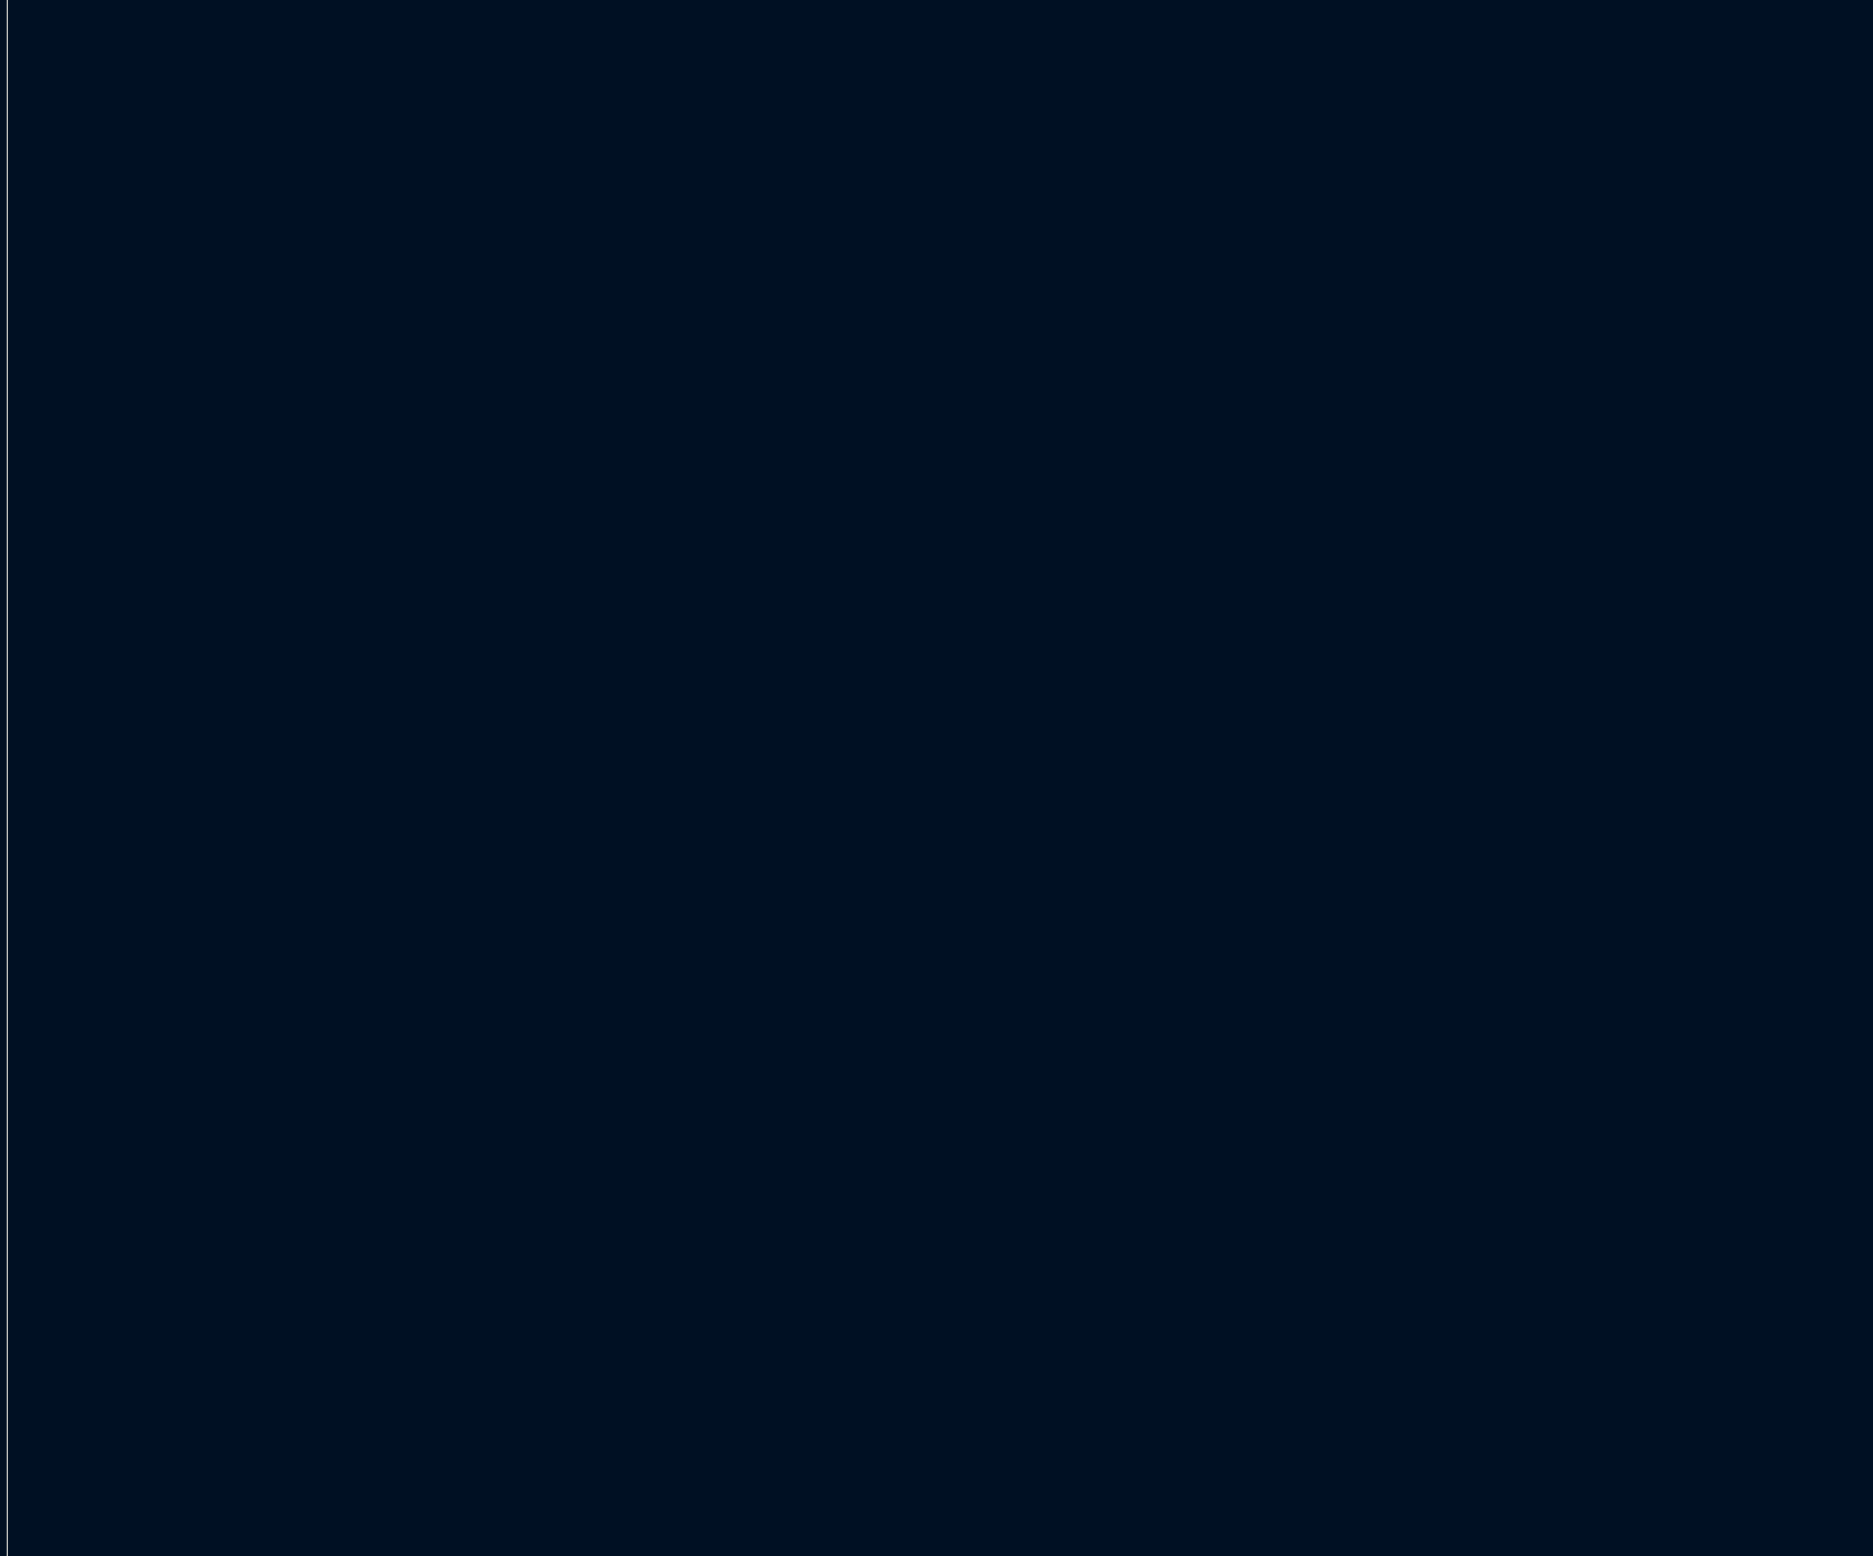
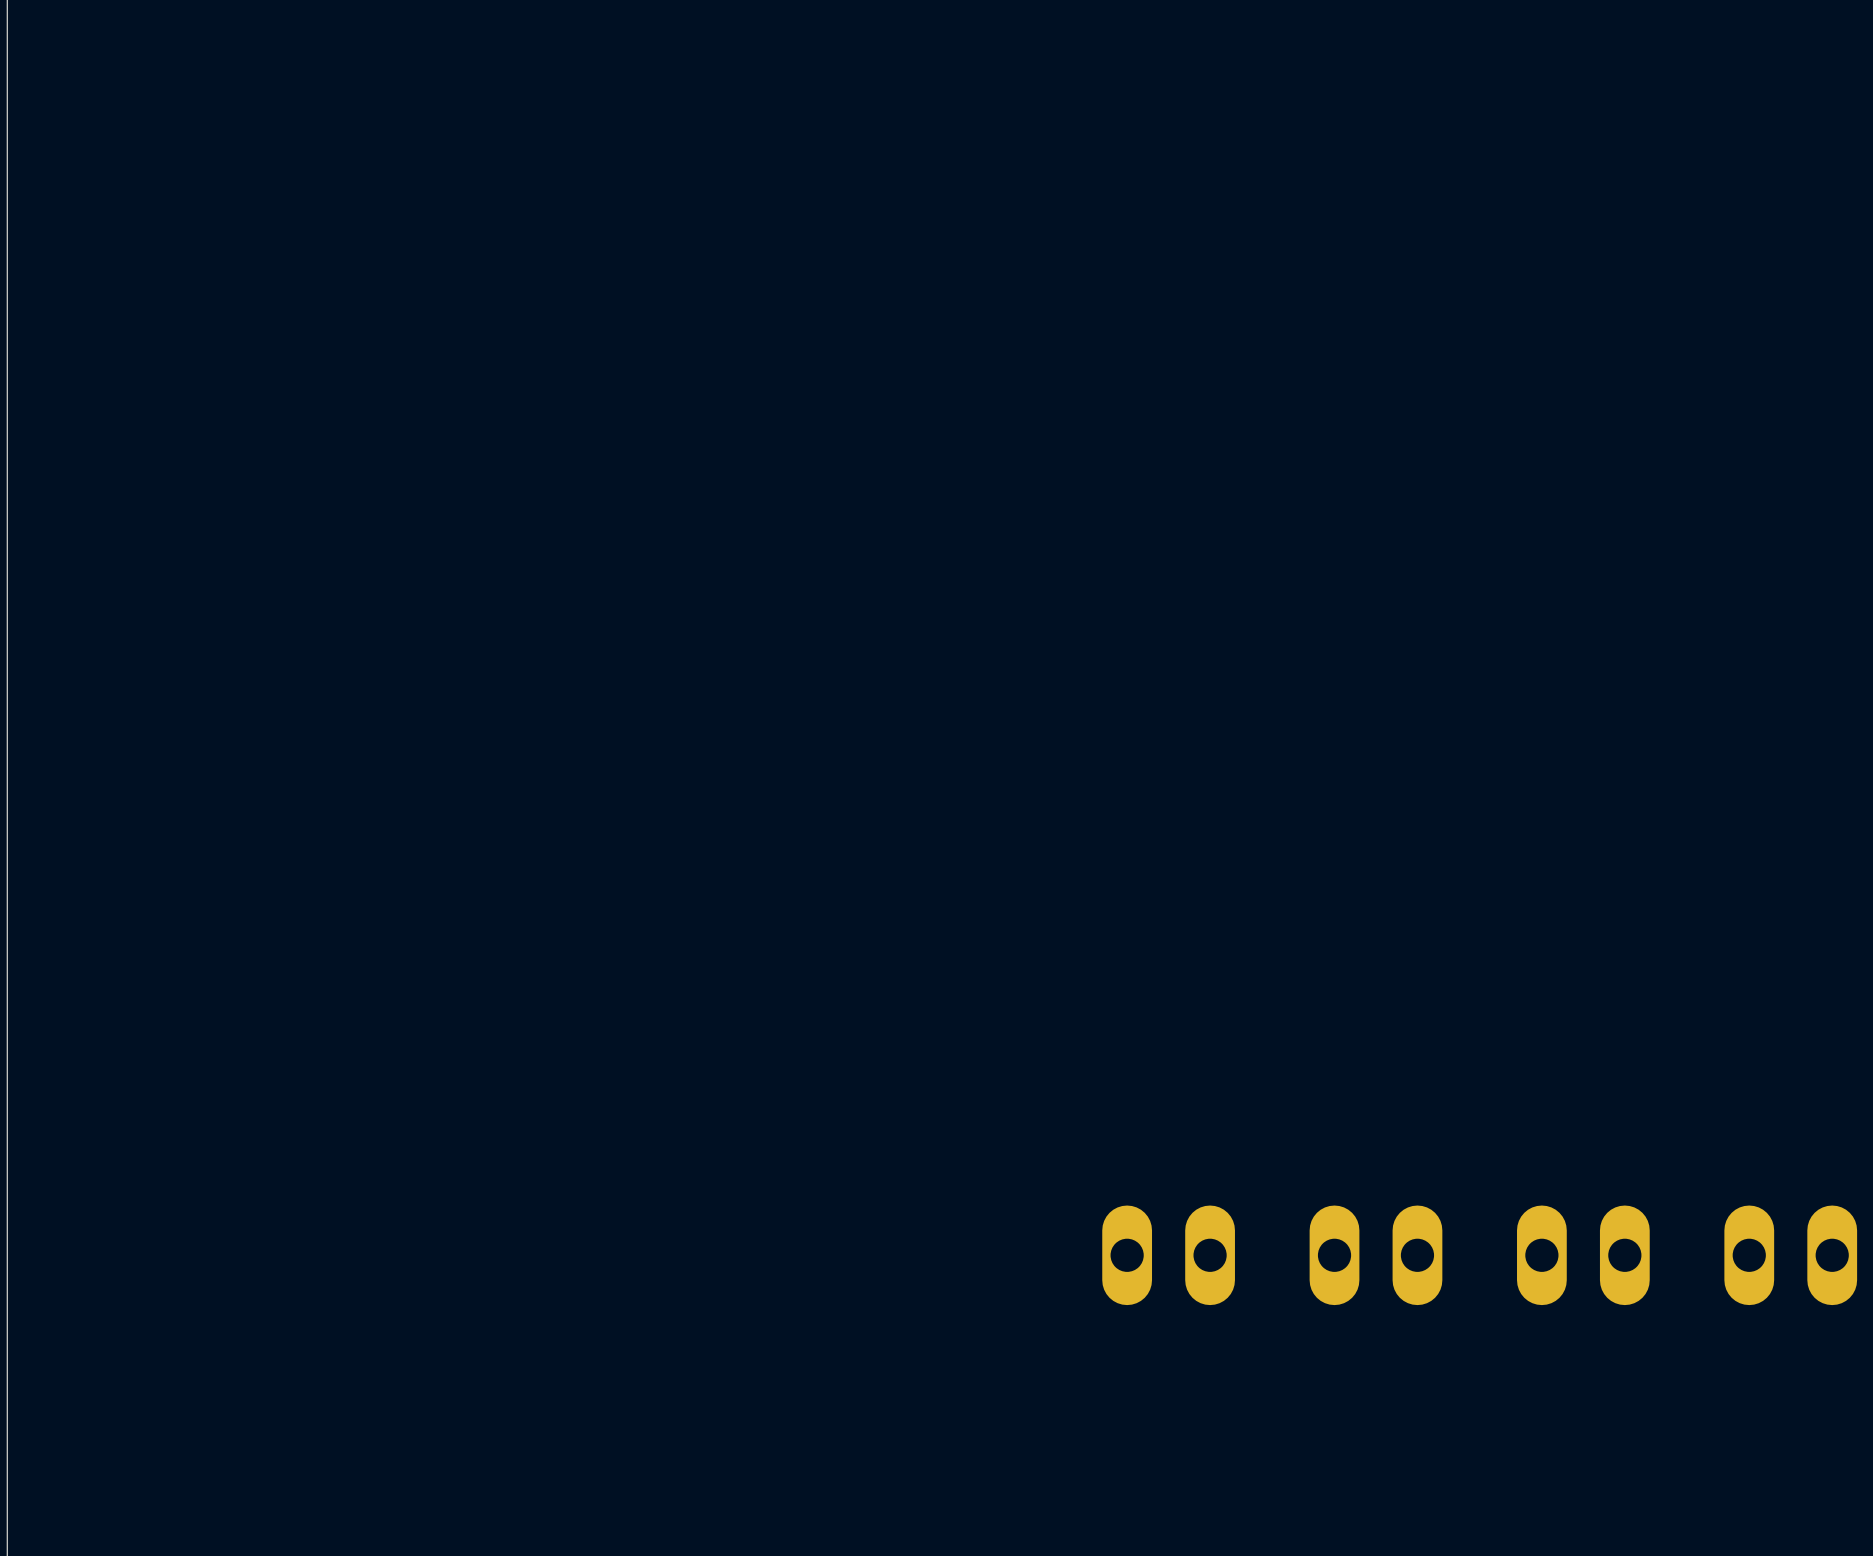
part: none -> (1168, 1255)
part: none -> (1375, 1255)
part: none -> (1583, 1255)
part: none -> (1790, 1255)

